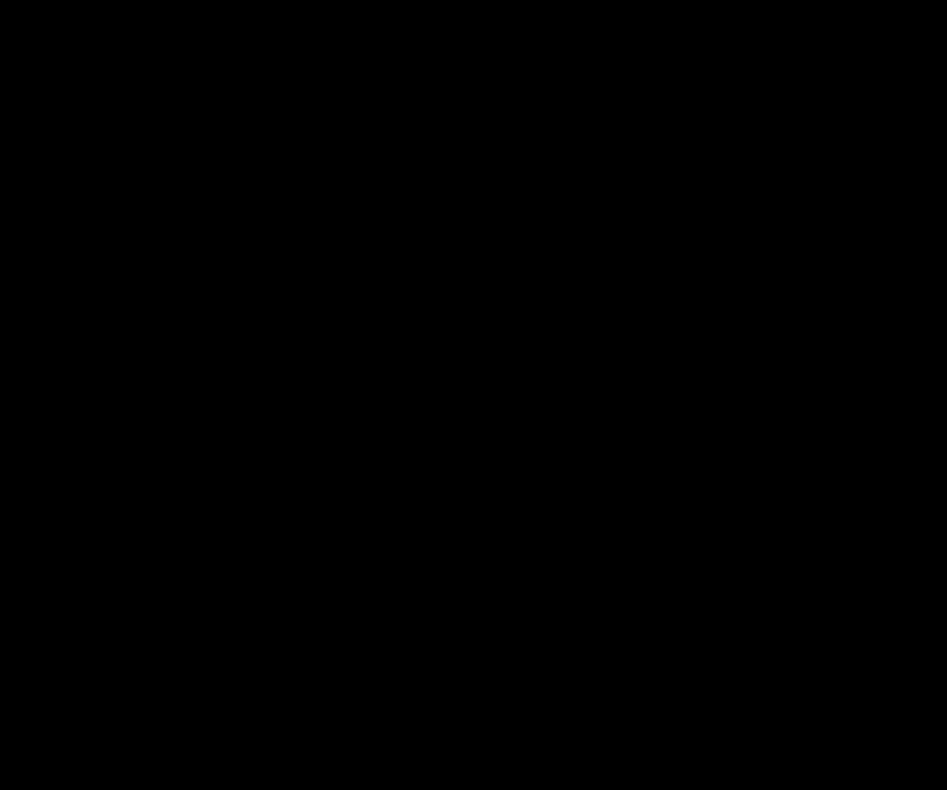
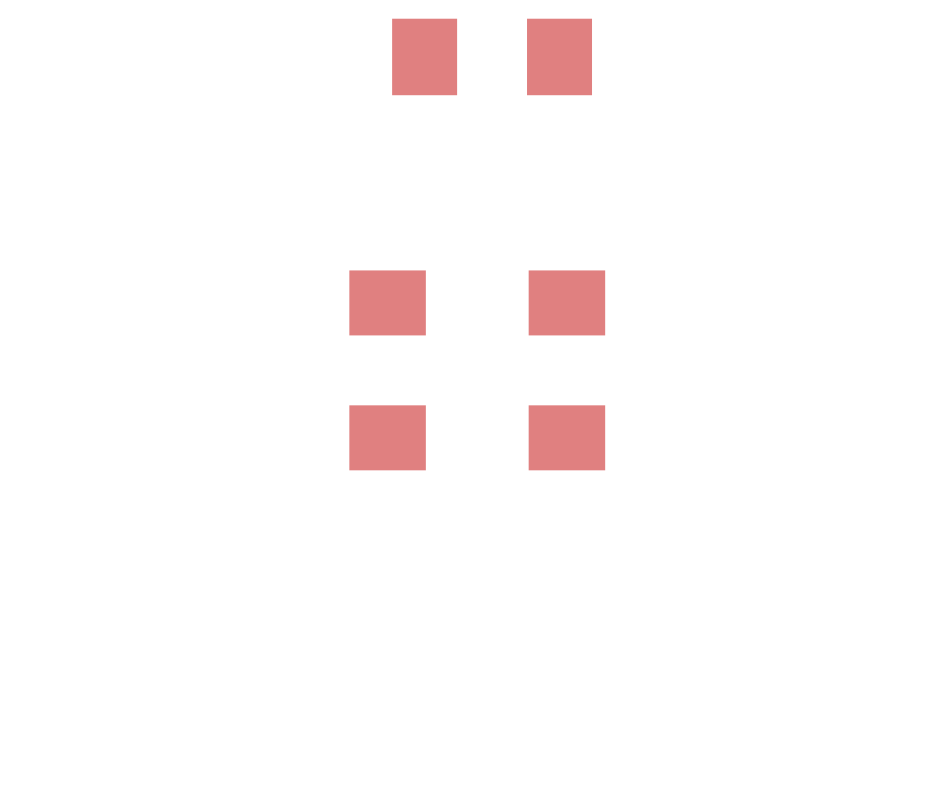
part: none -> (492, 56)
part: none -> (387, 370)
part: none -> (566, 370)

